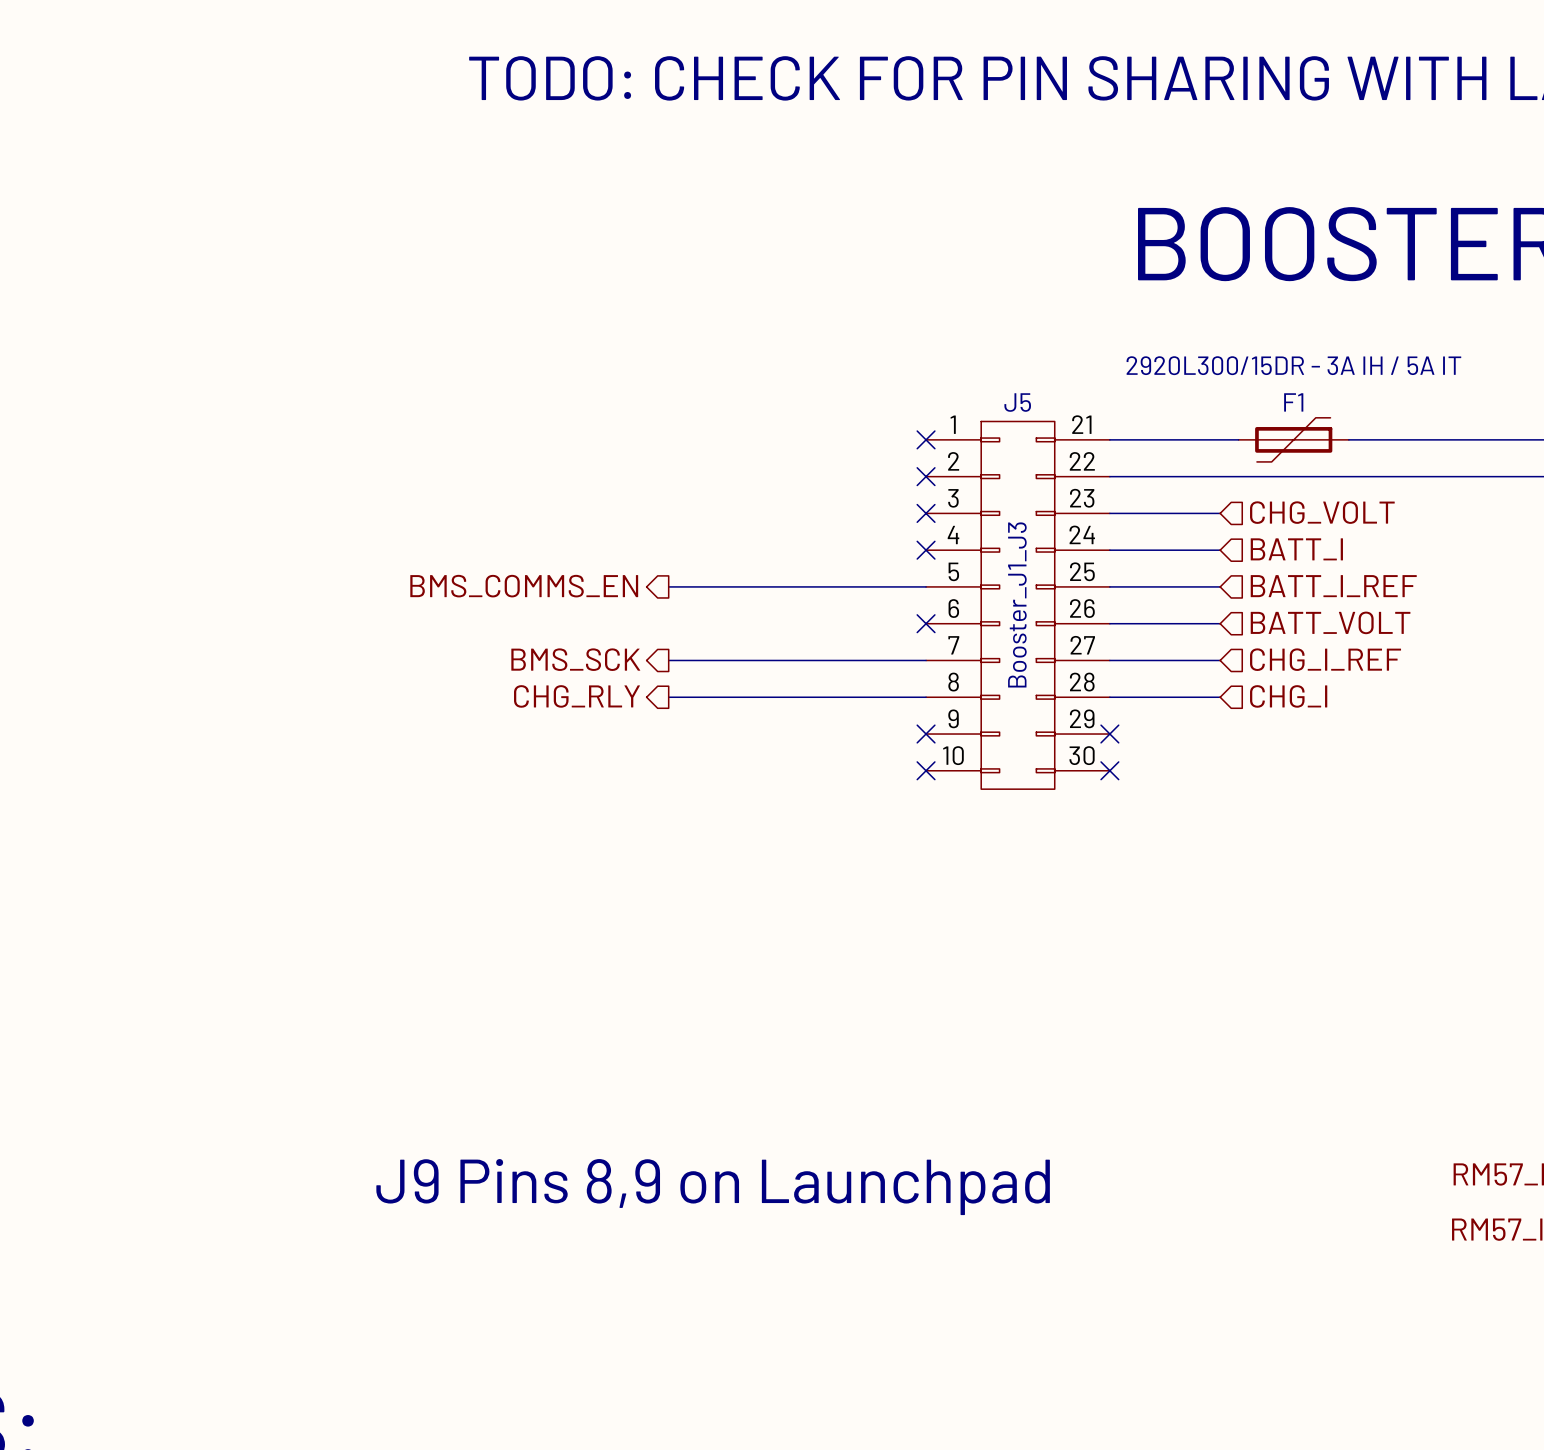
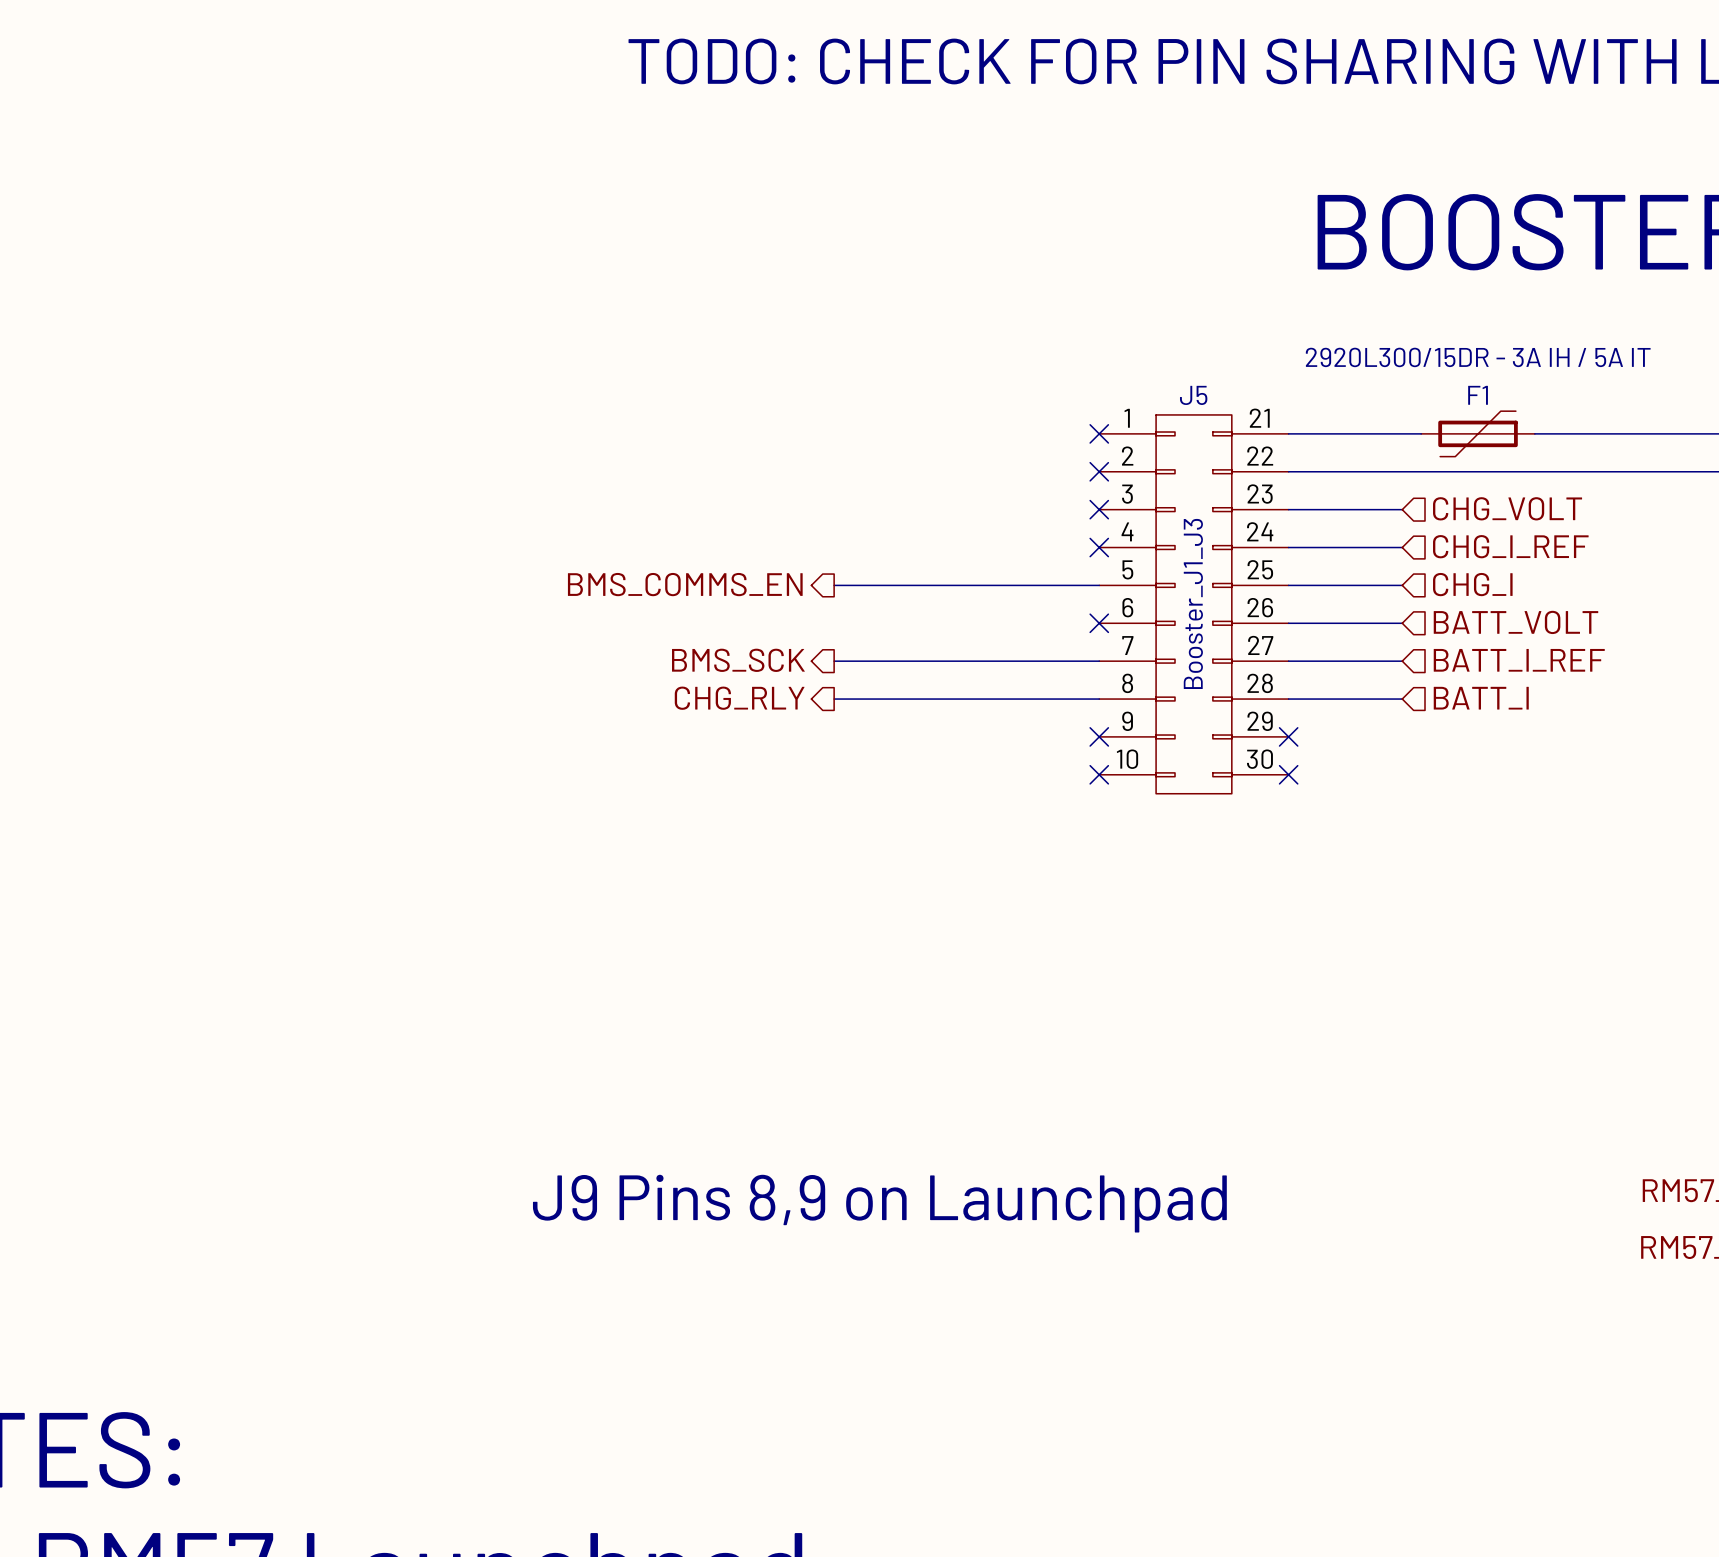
hierarchical label: BATT_I (1296, 549) -> CHG_I_REF (1510, 546)
hierarchical label: BATT_I_REF (1333, 586) -> CHG_I (1472, 584)
hierarchical label: CHG_I_REF (1325, 659) -> BATT_I_REF (1519, 660)
hierarchical label: CHG_I (1288, 696) -> BATT_I (1481, 698)

